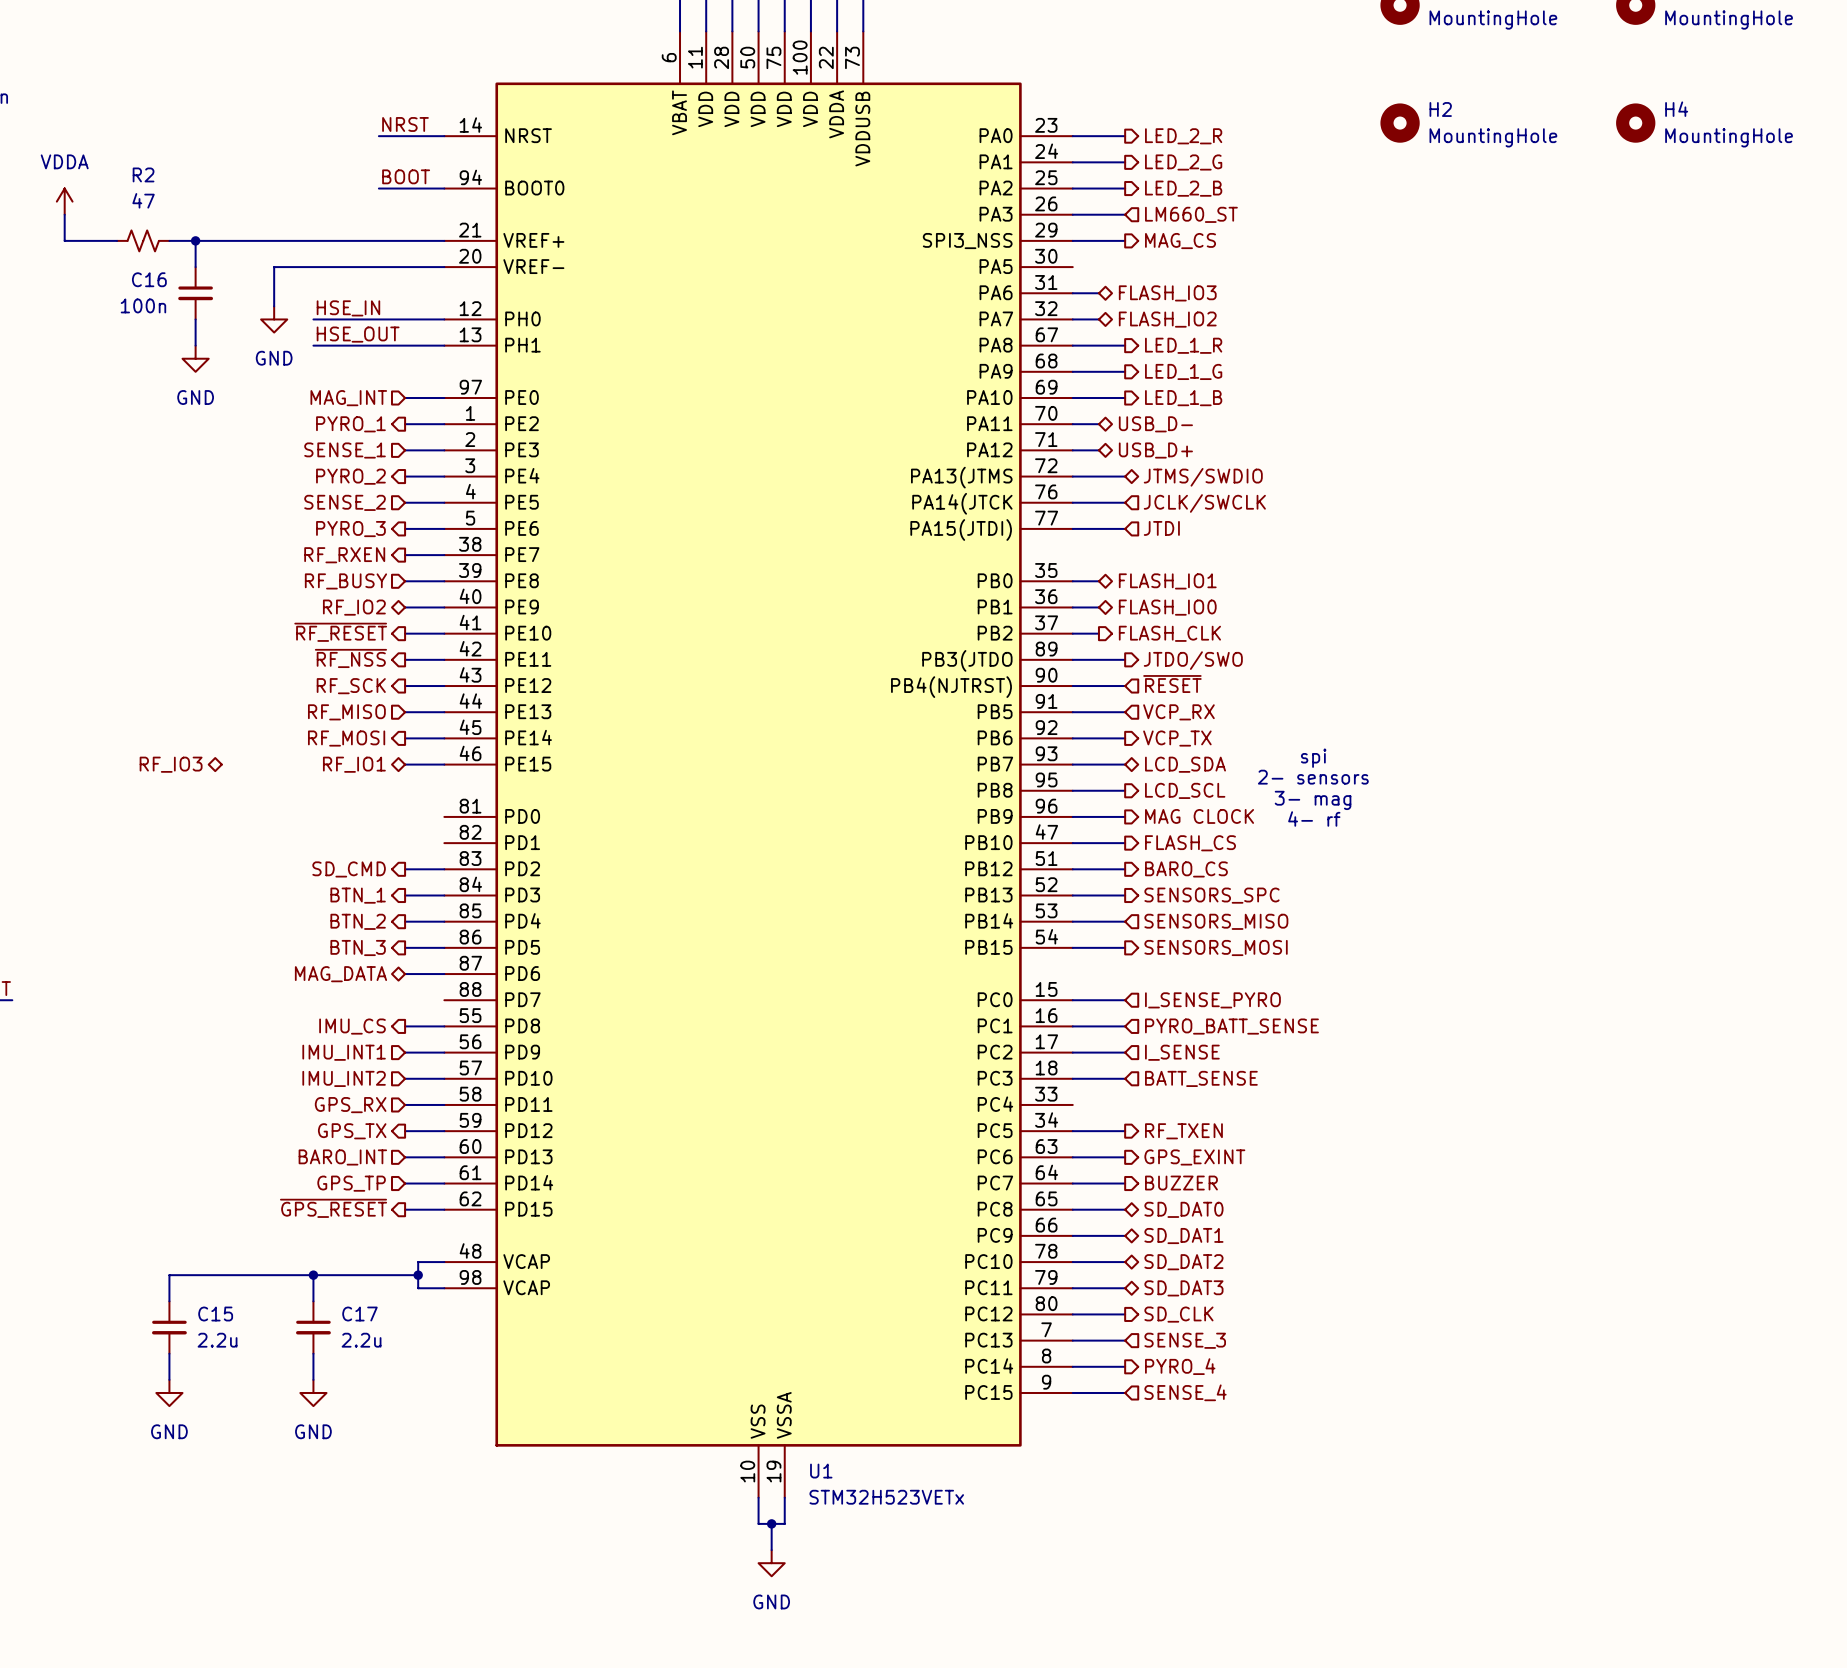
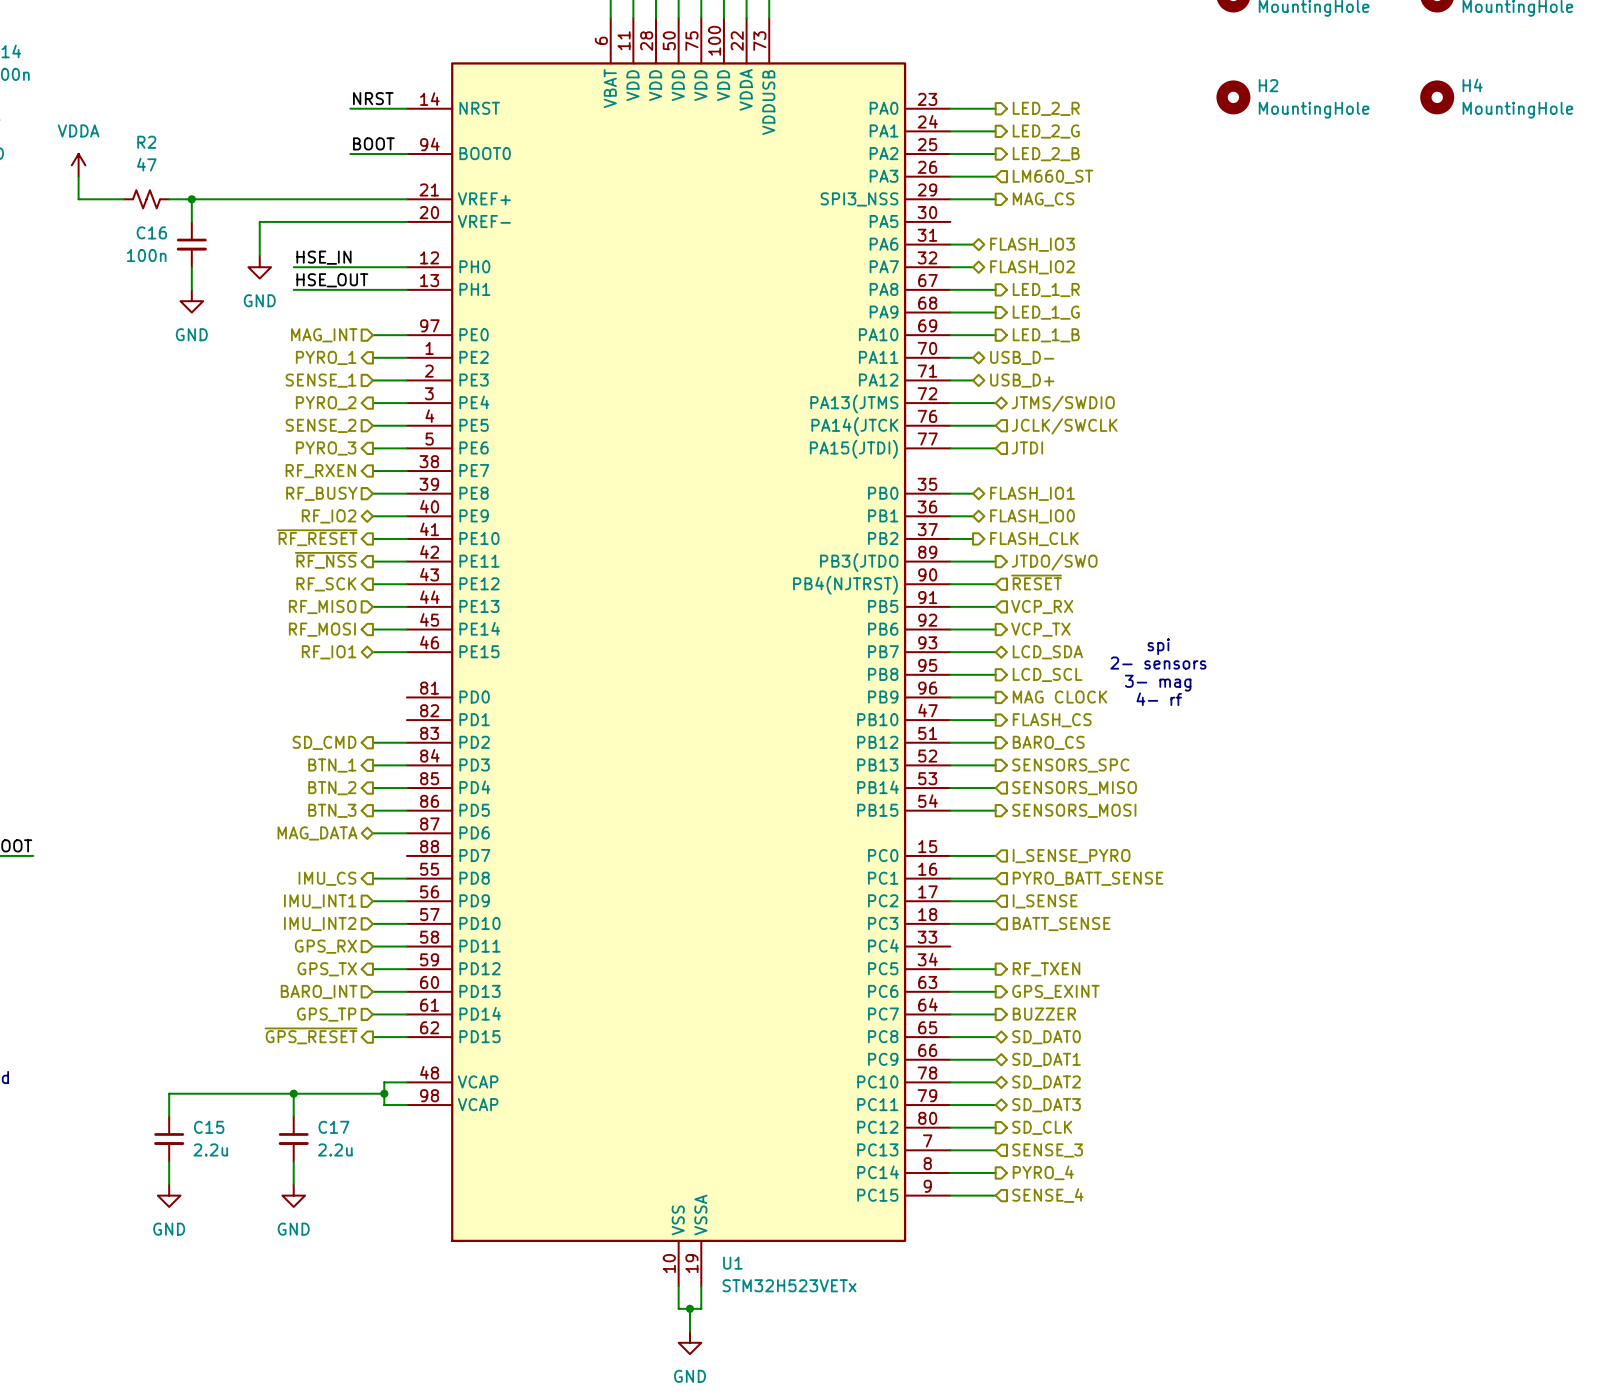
hierarchical label: RF_IO3 (171, 764) -> none

